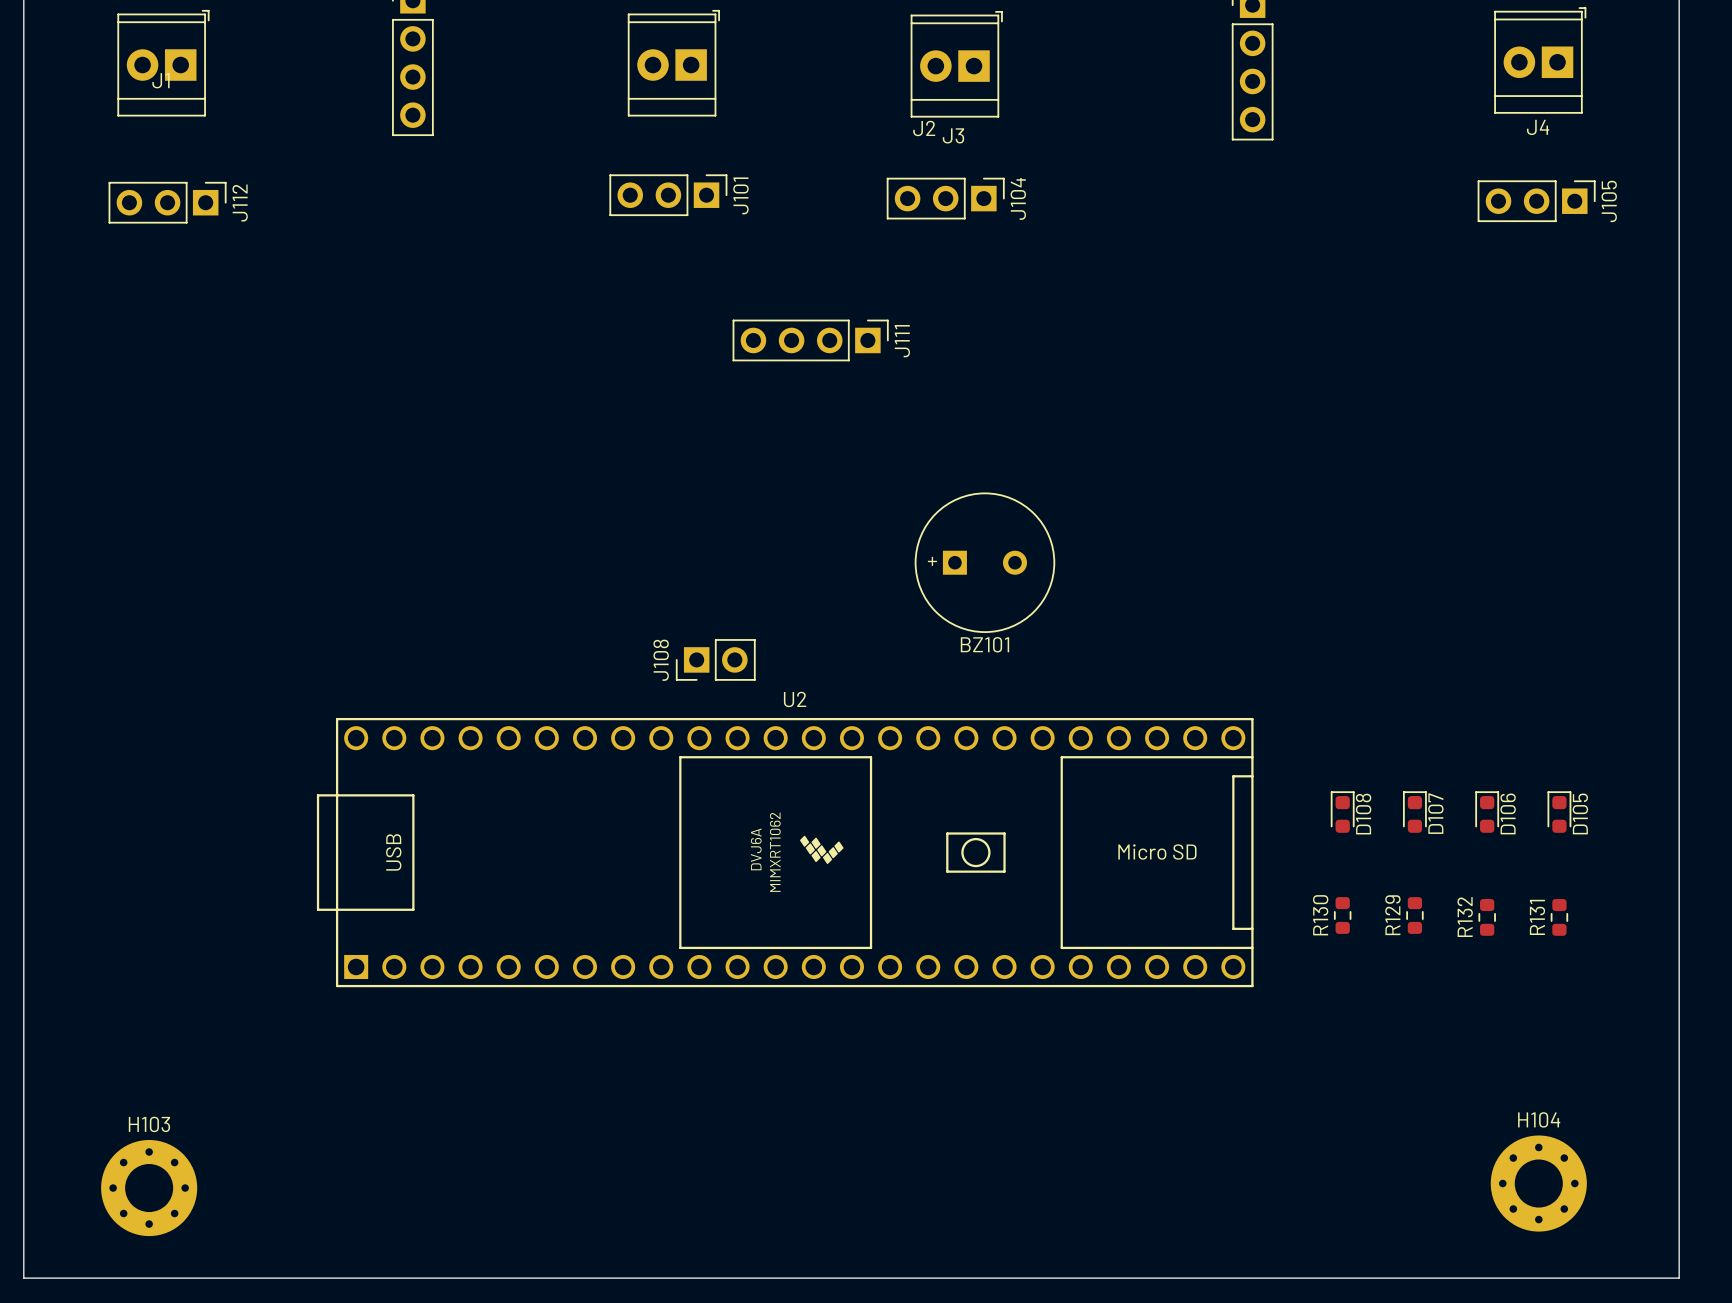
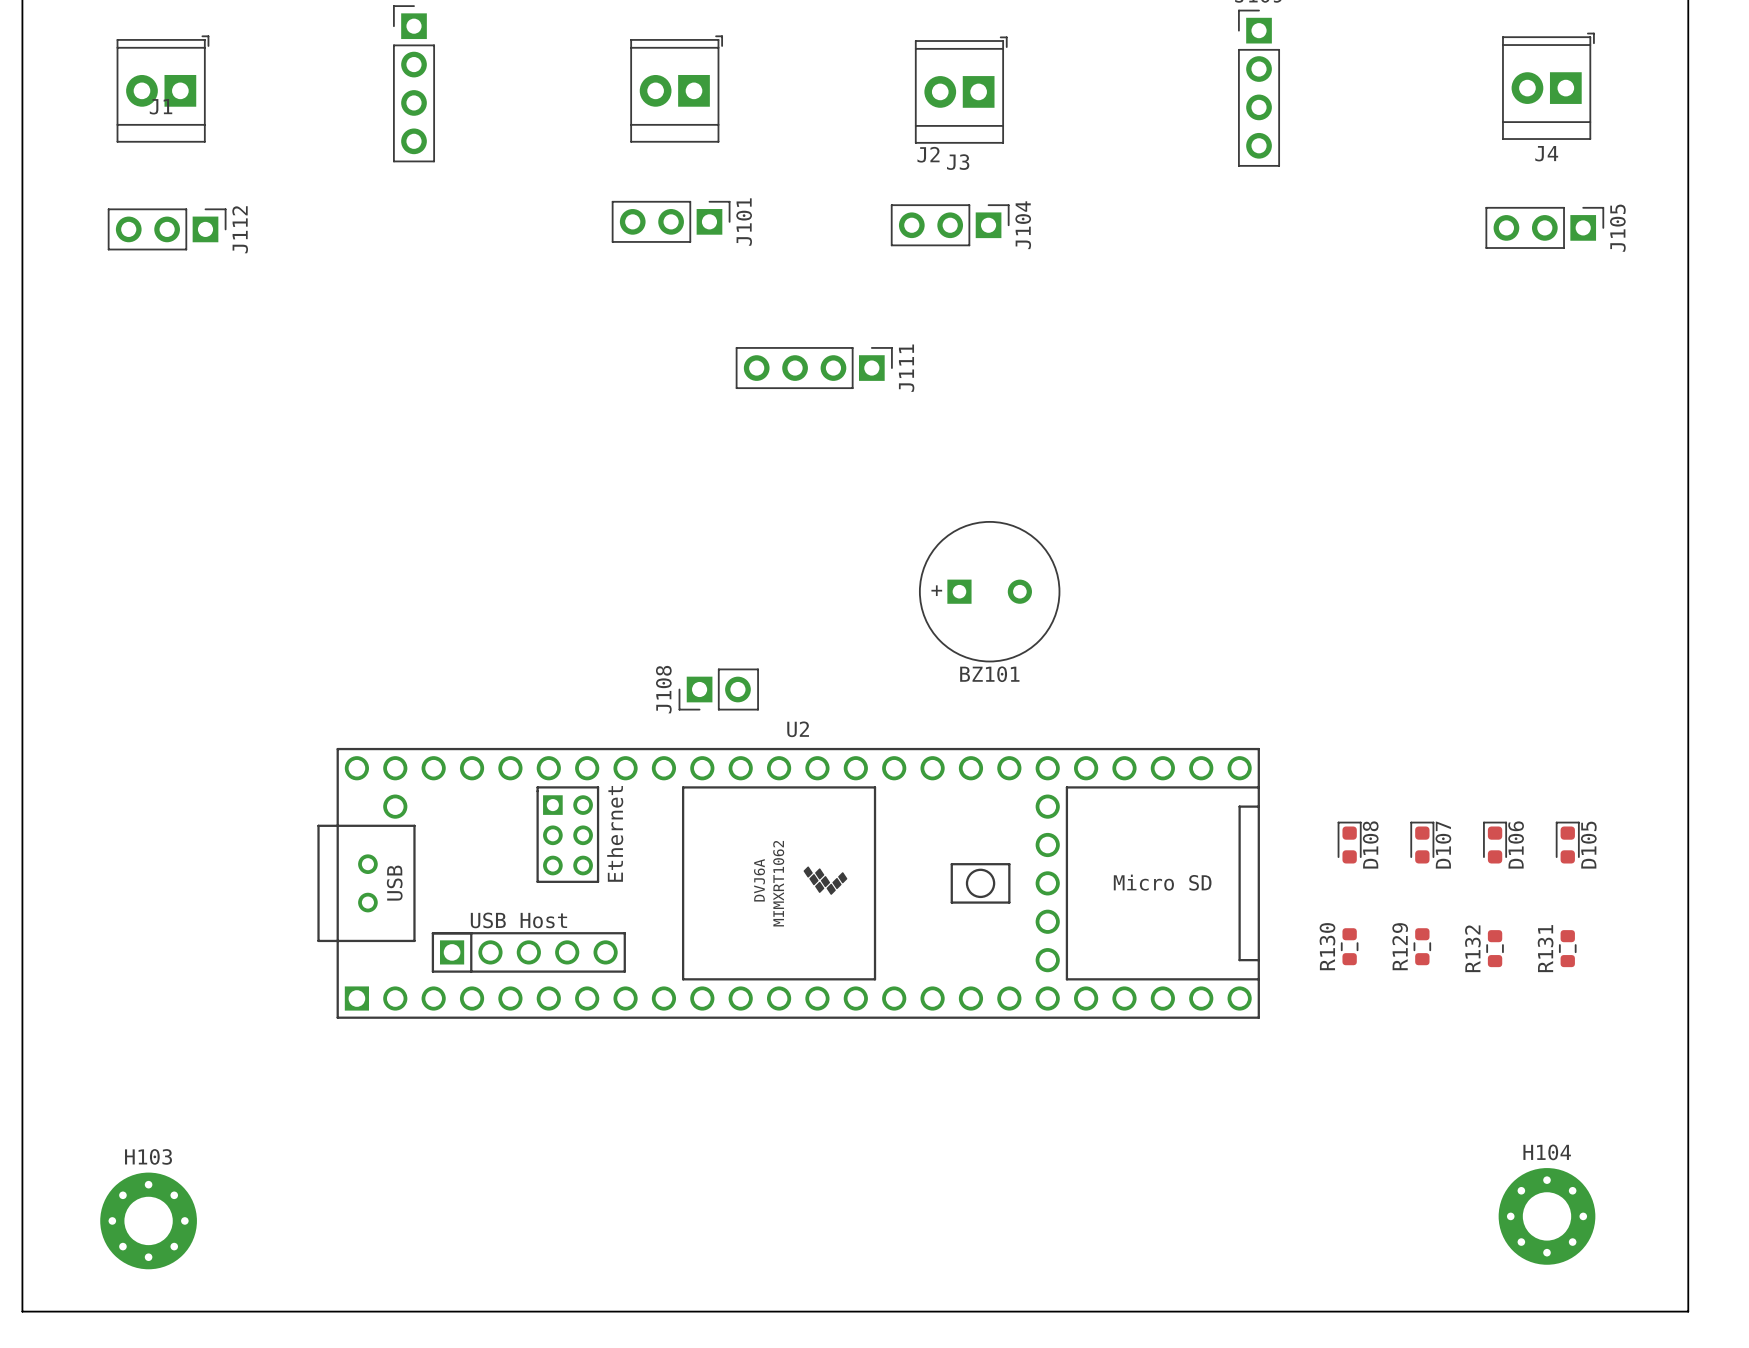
U2 footprint: [316, 717, 1254, 988] -> [317, 747, 1260, 1019]

